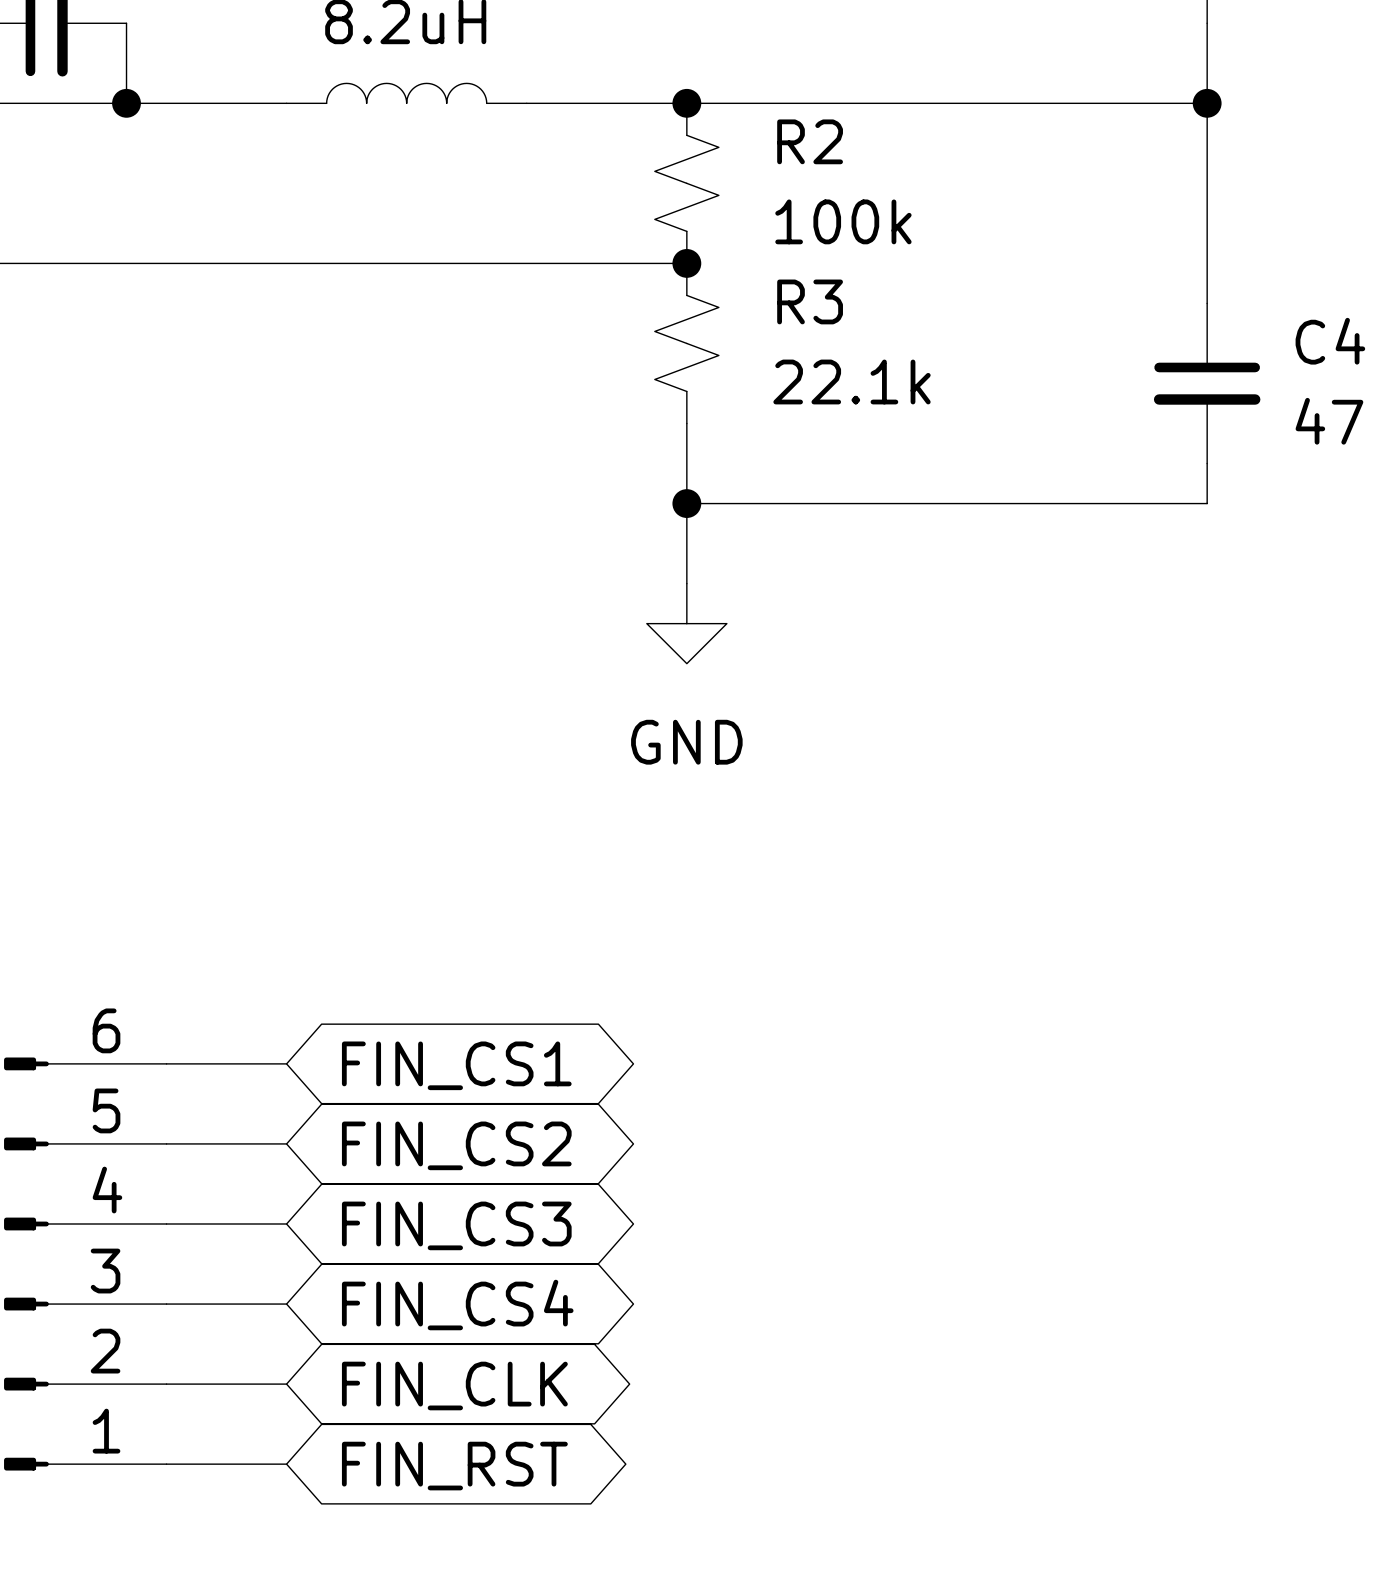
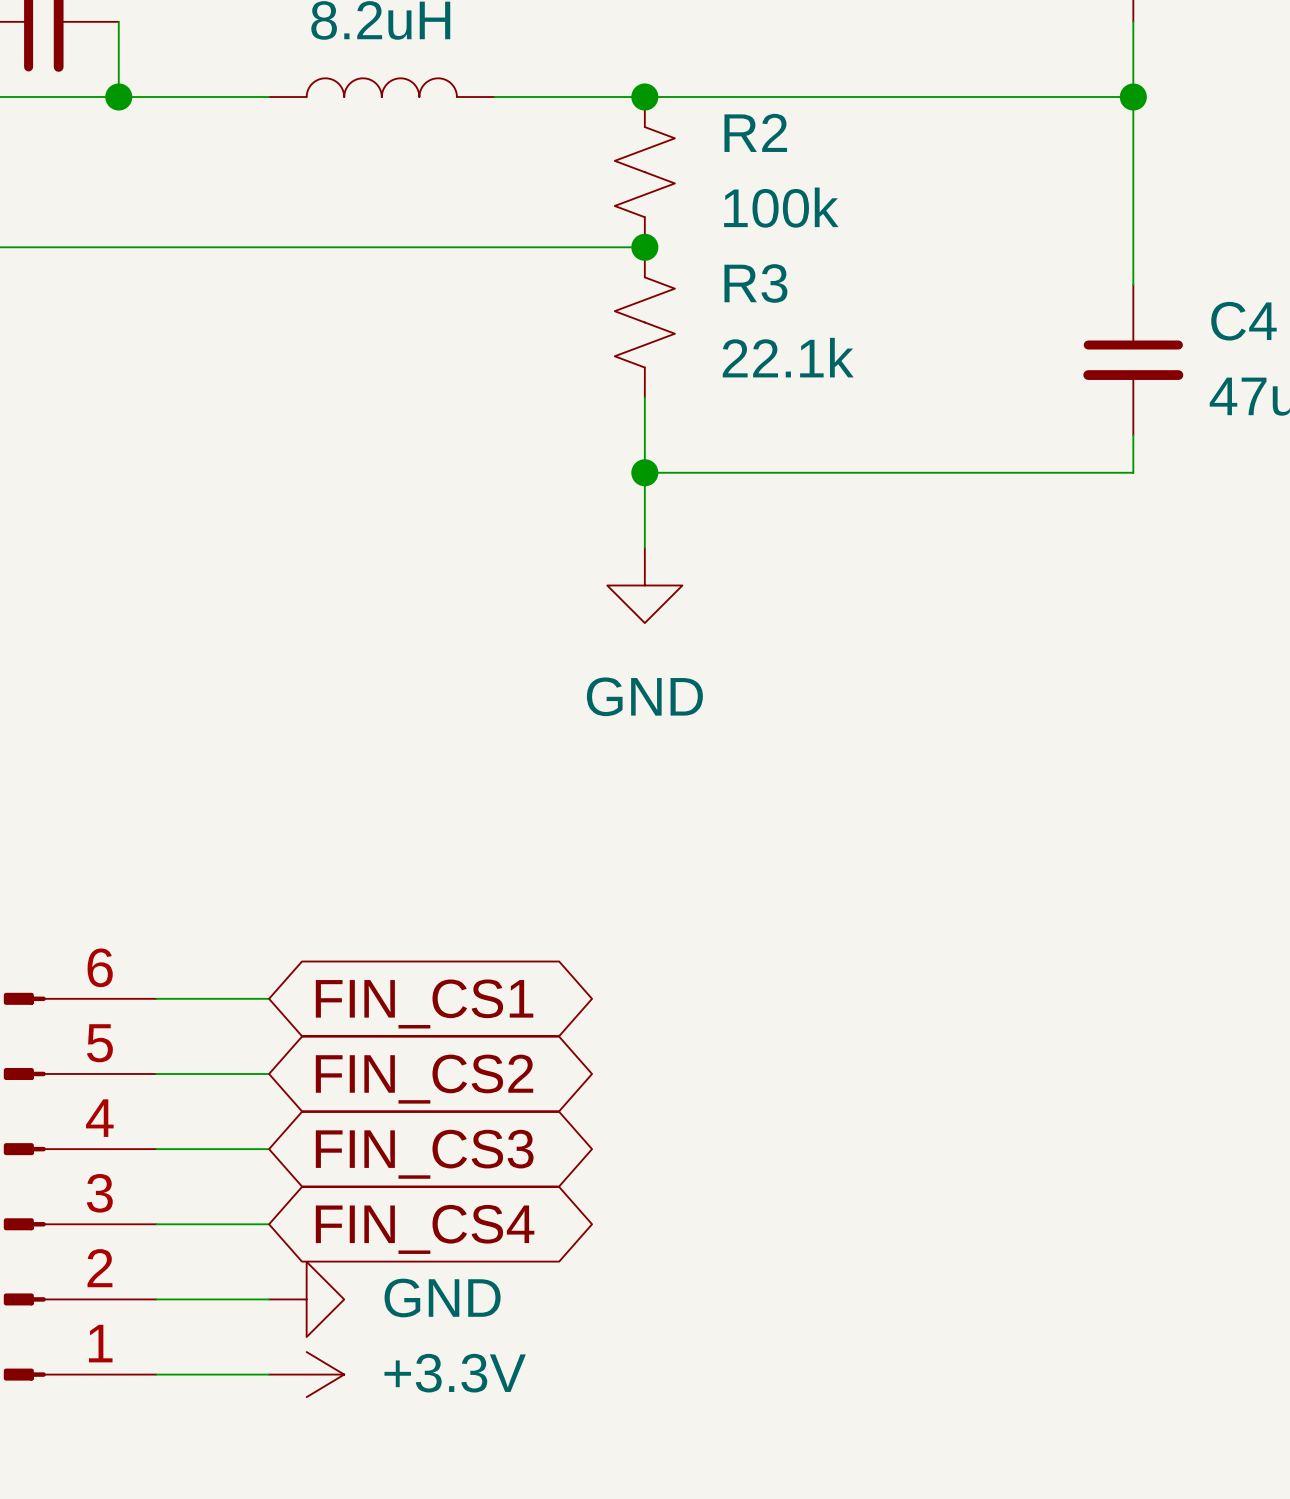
power symbol: none -> GND (306, 1299)
global label: FIN_CLK (454, 1386) -> none
power symbol: none -> +3.3V (306, 1374)
global label: FIN_RST (454, 1466) -> none

